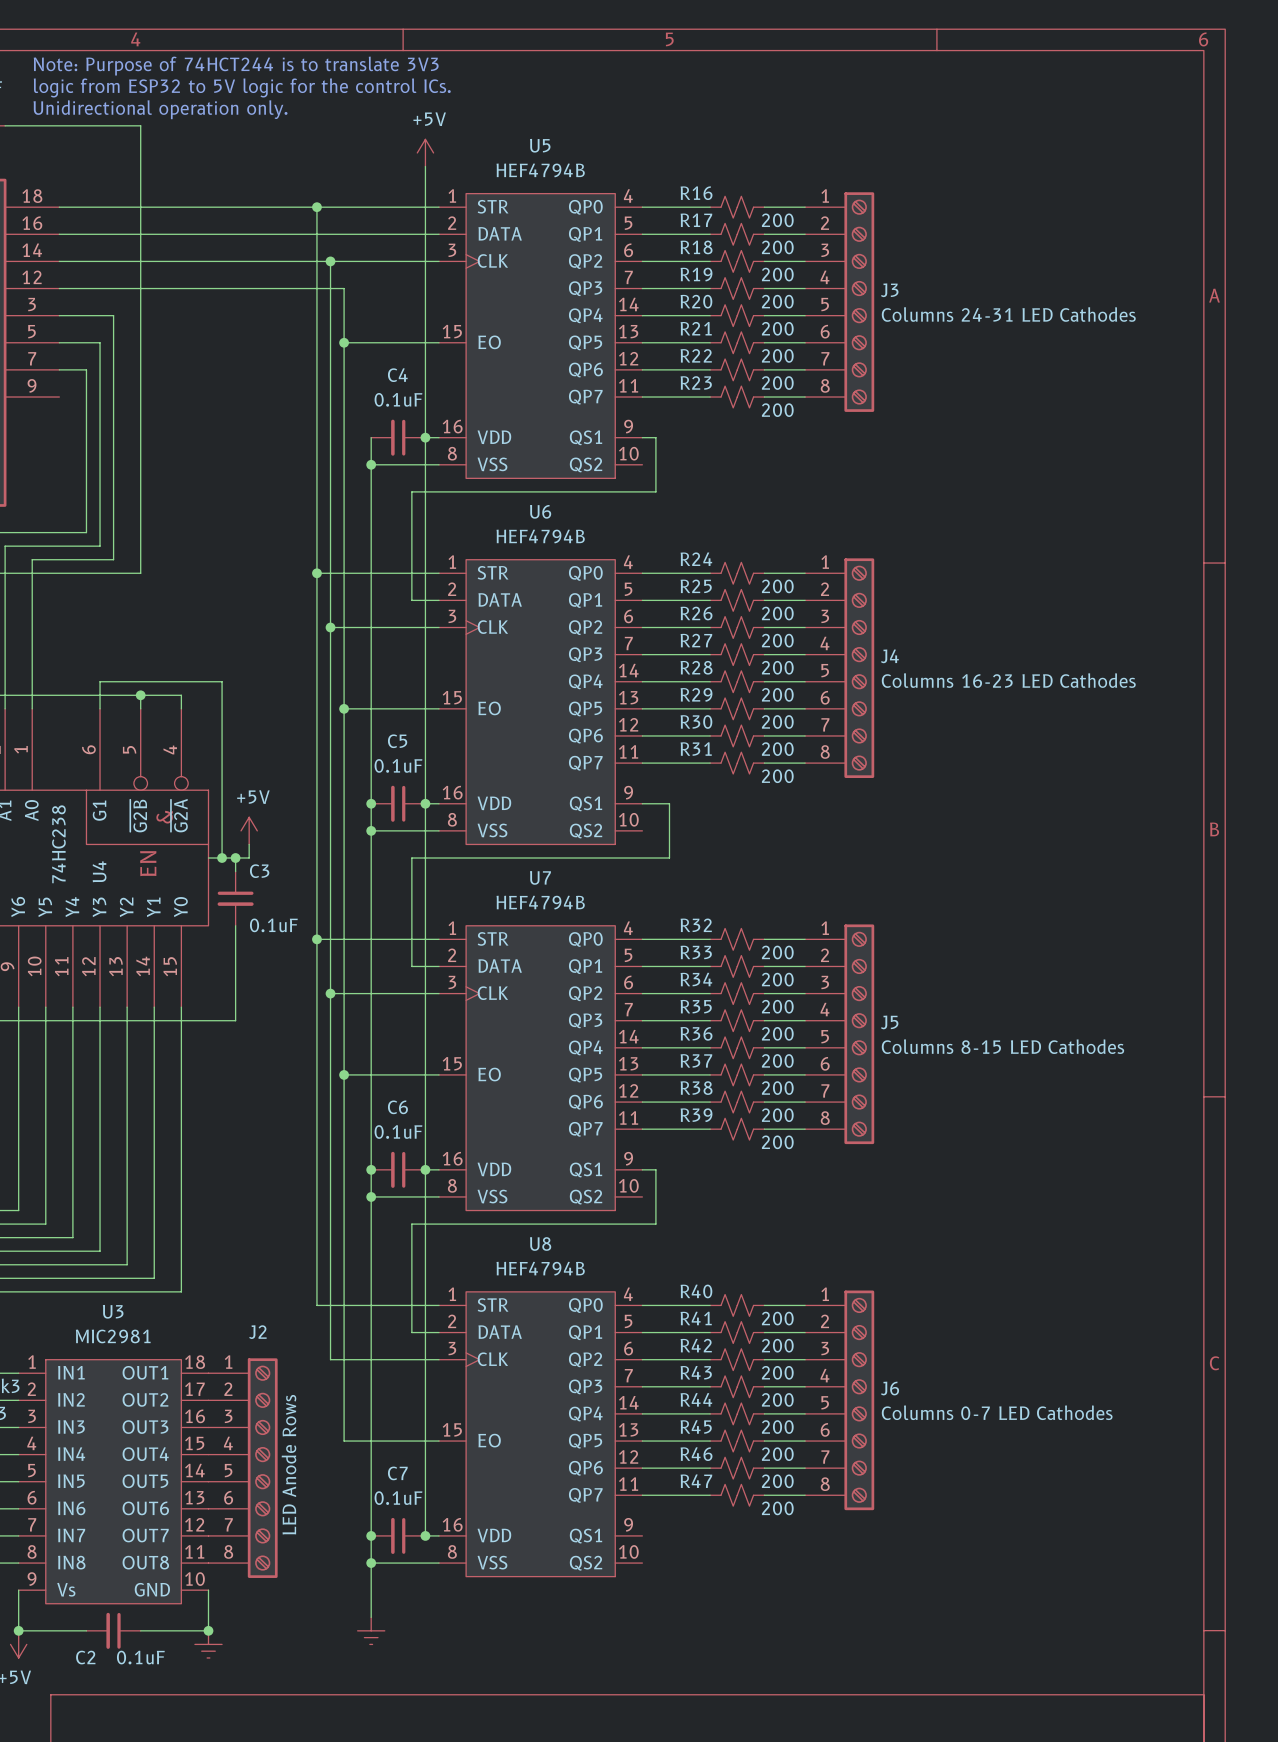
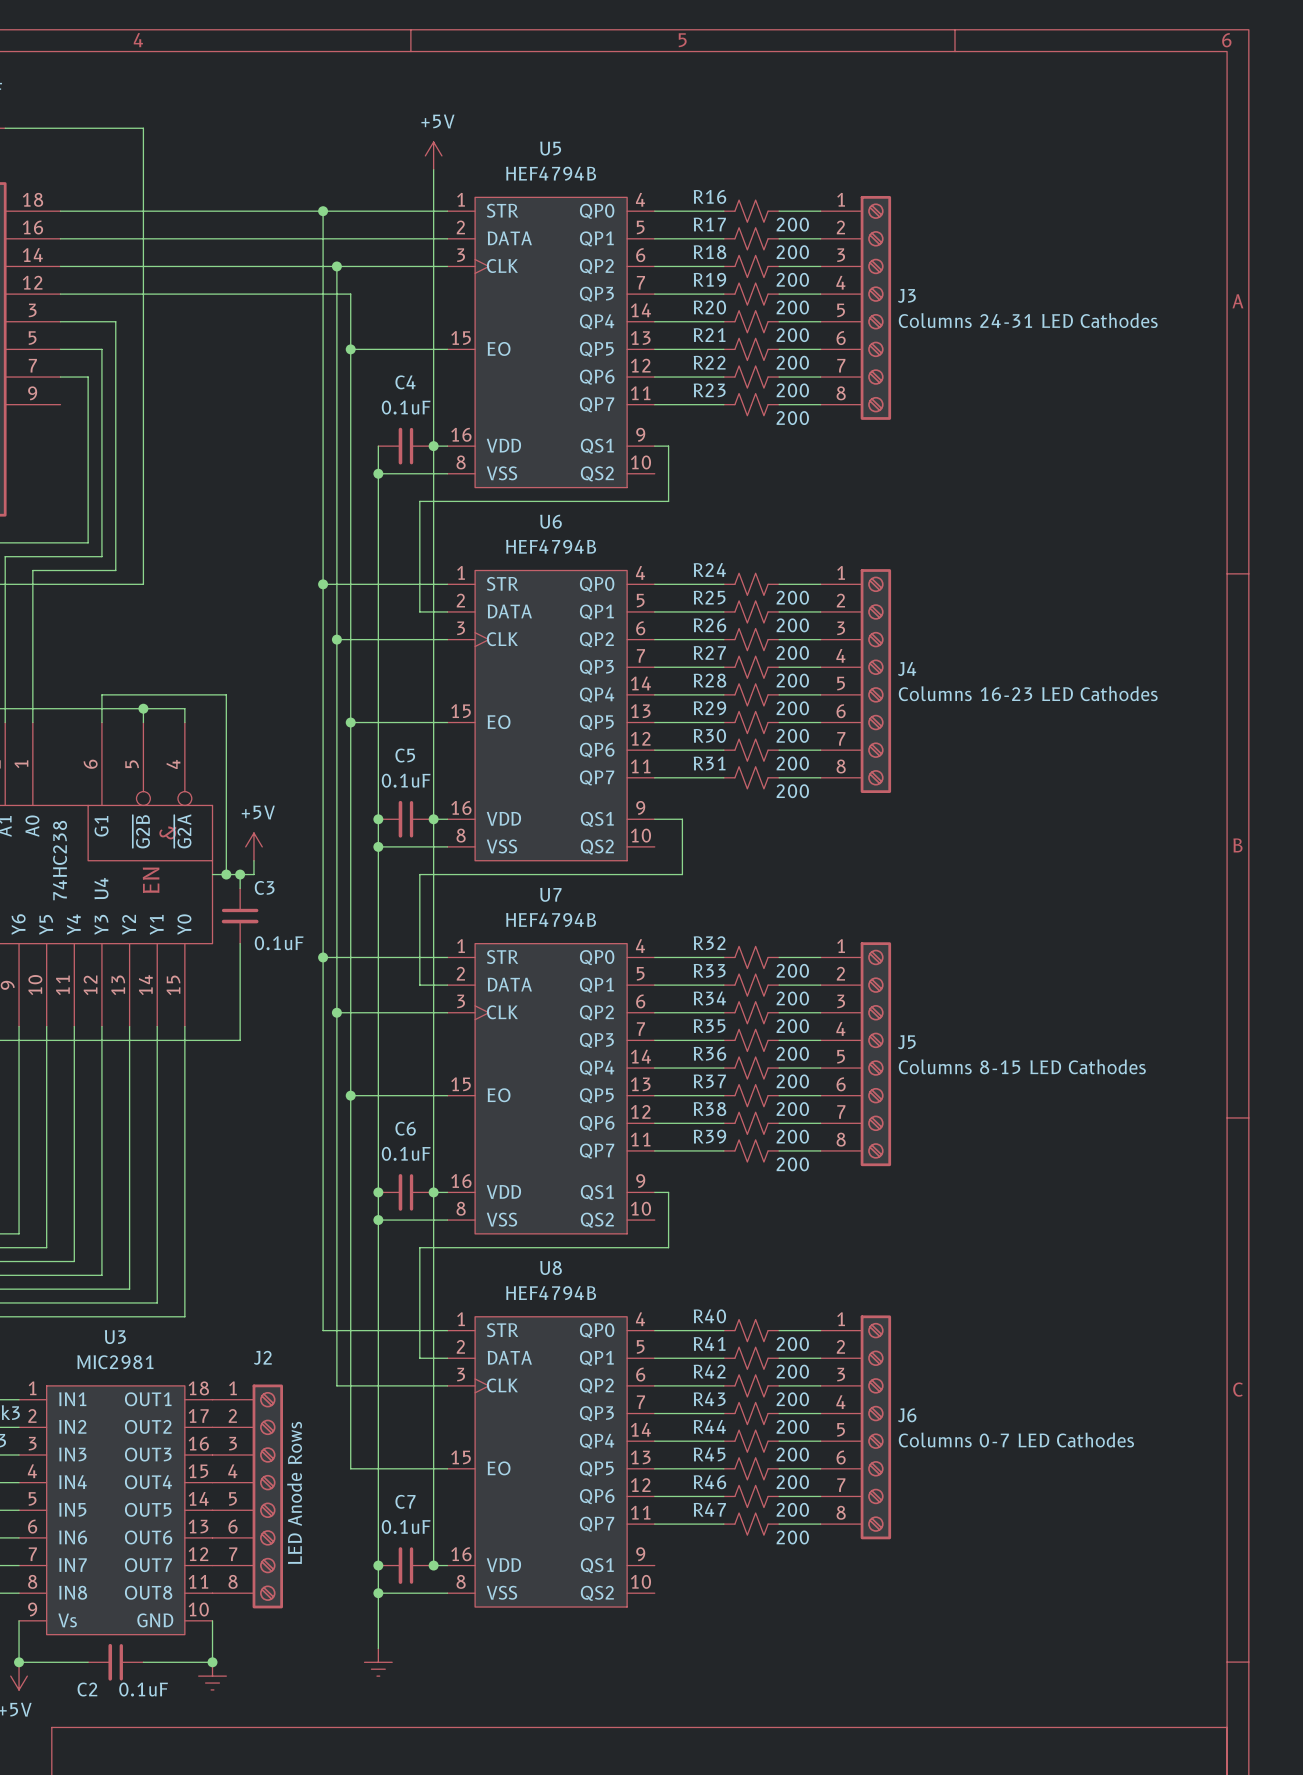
text: Note: Purpose of 74HCT244 is to translate 3V3 (236, 66) -> none
text: logic from ESP32 to 5V logic for the control ICs. (242, 87) -> none
text: Unidirectional operation only. (160, 109) -> none

